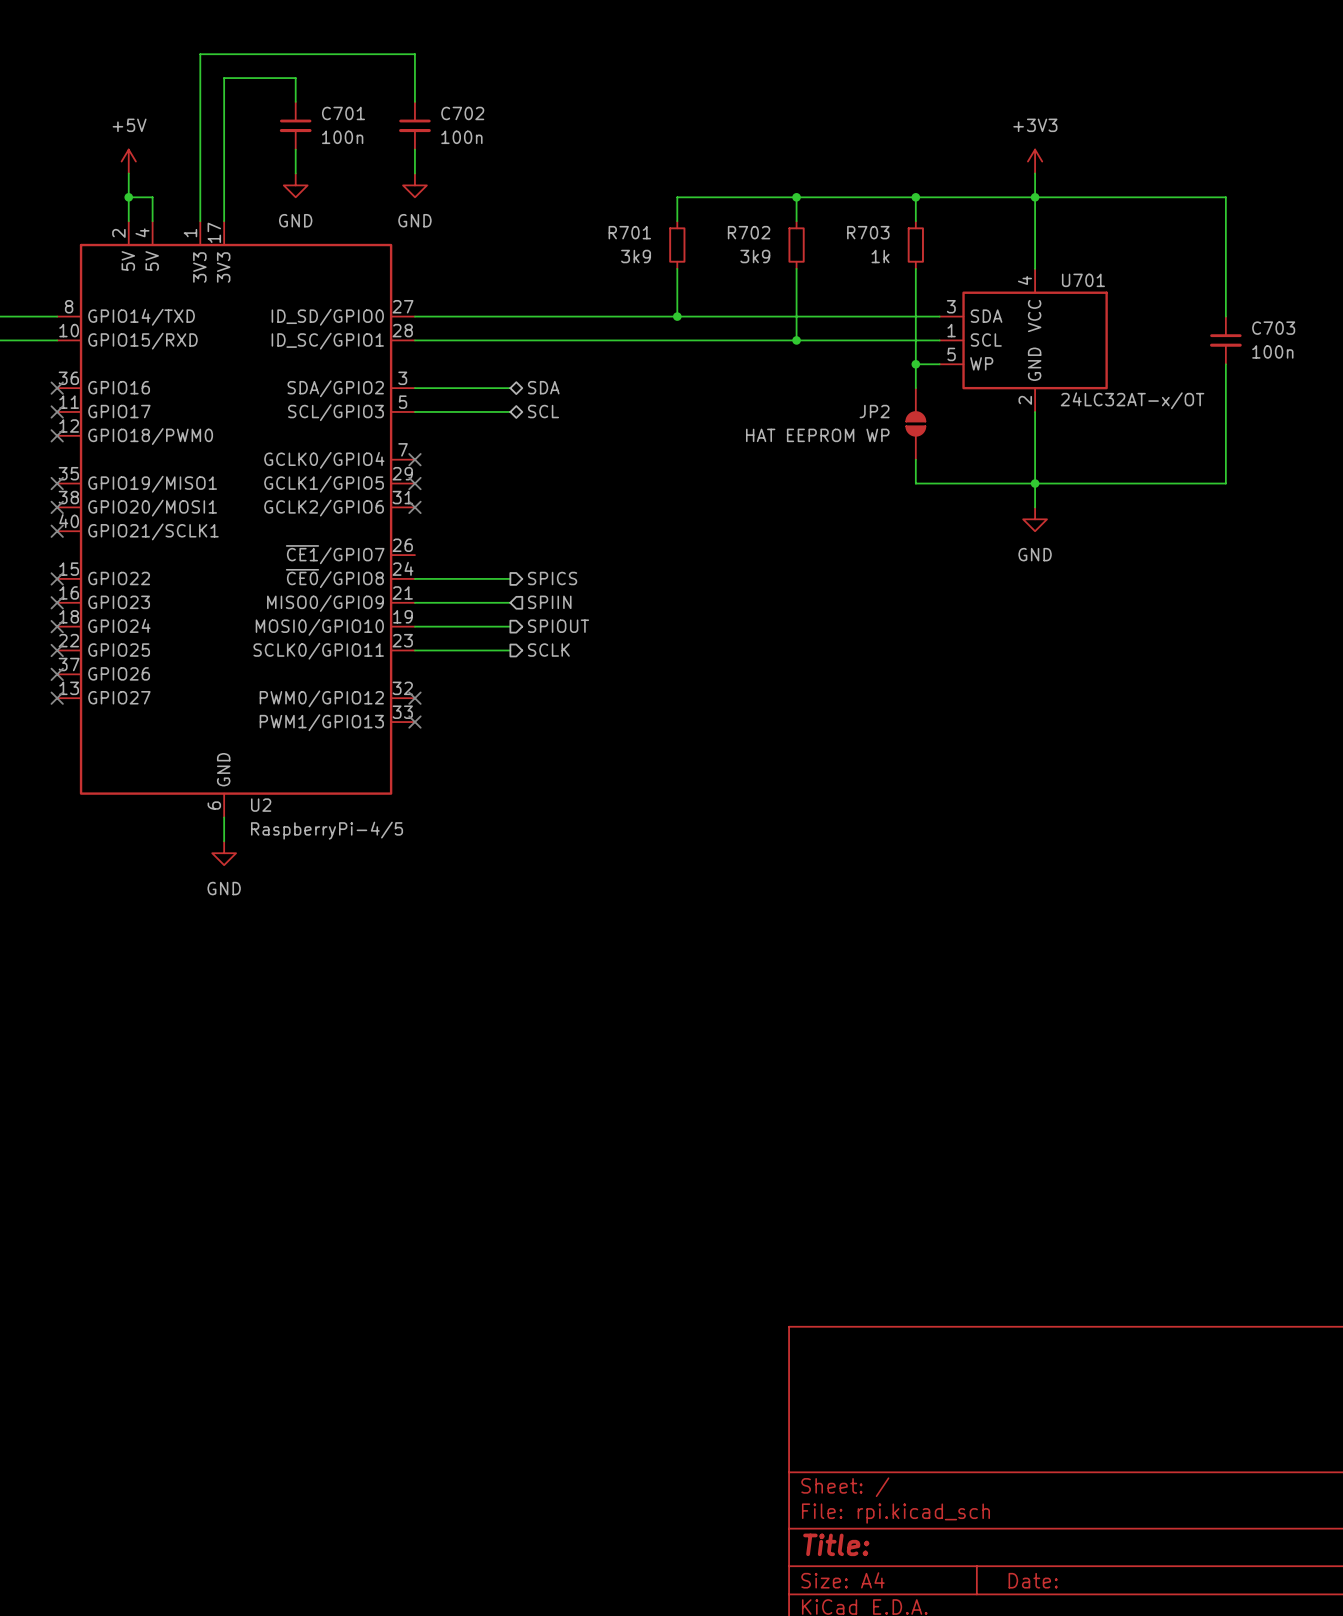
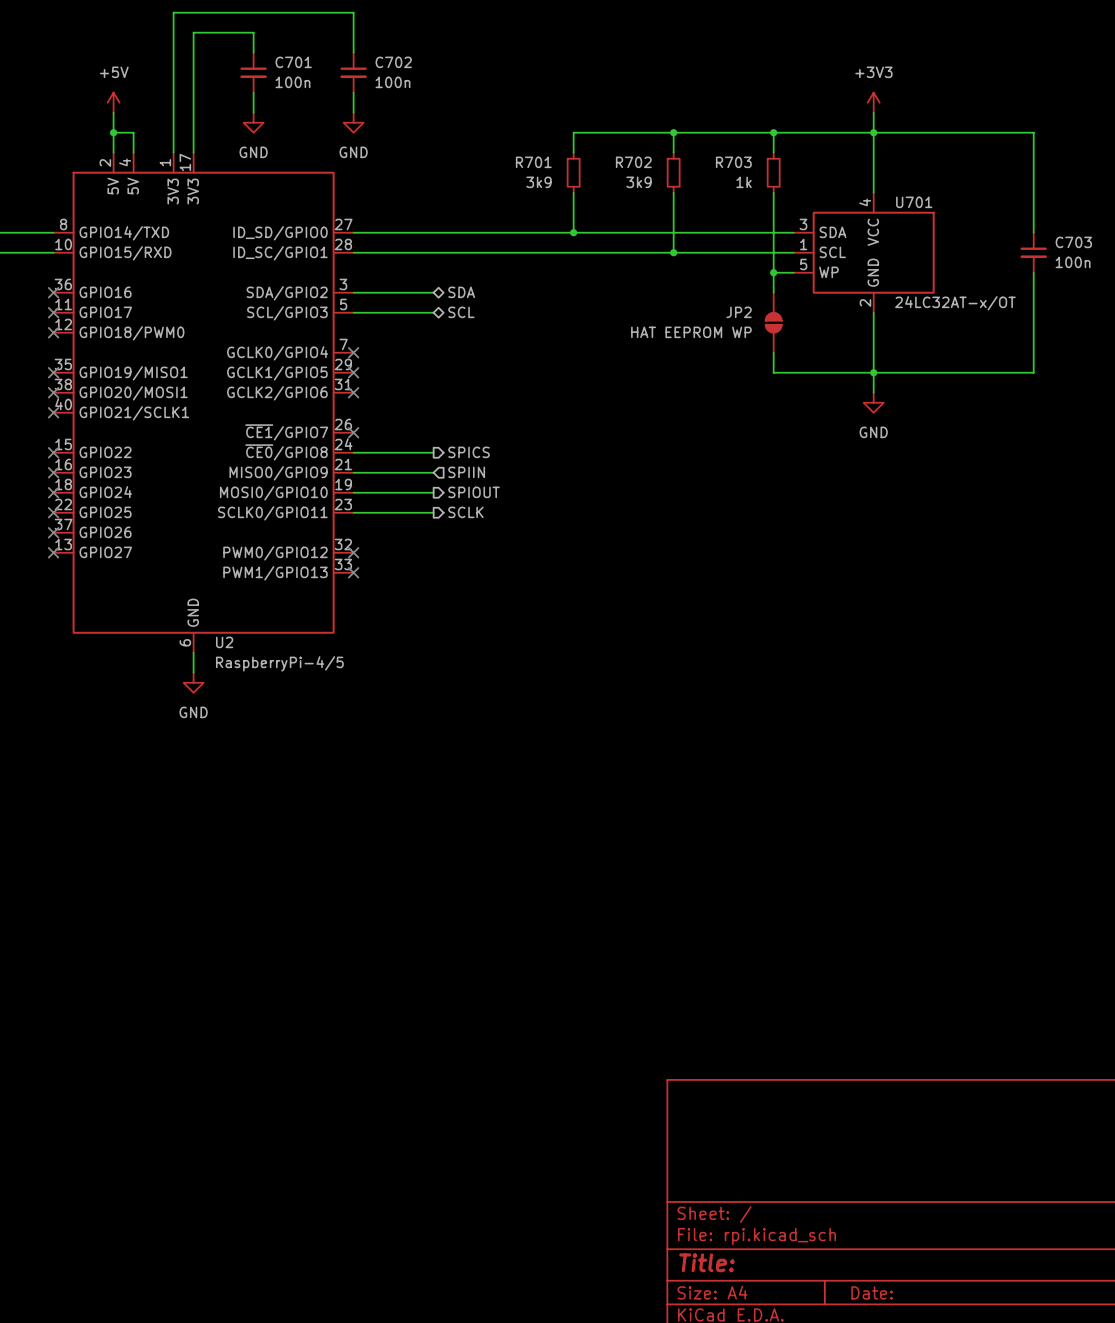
no-connect mark: none -> (353, 432)

